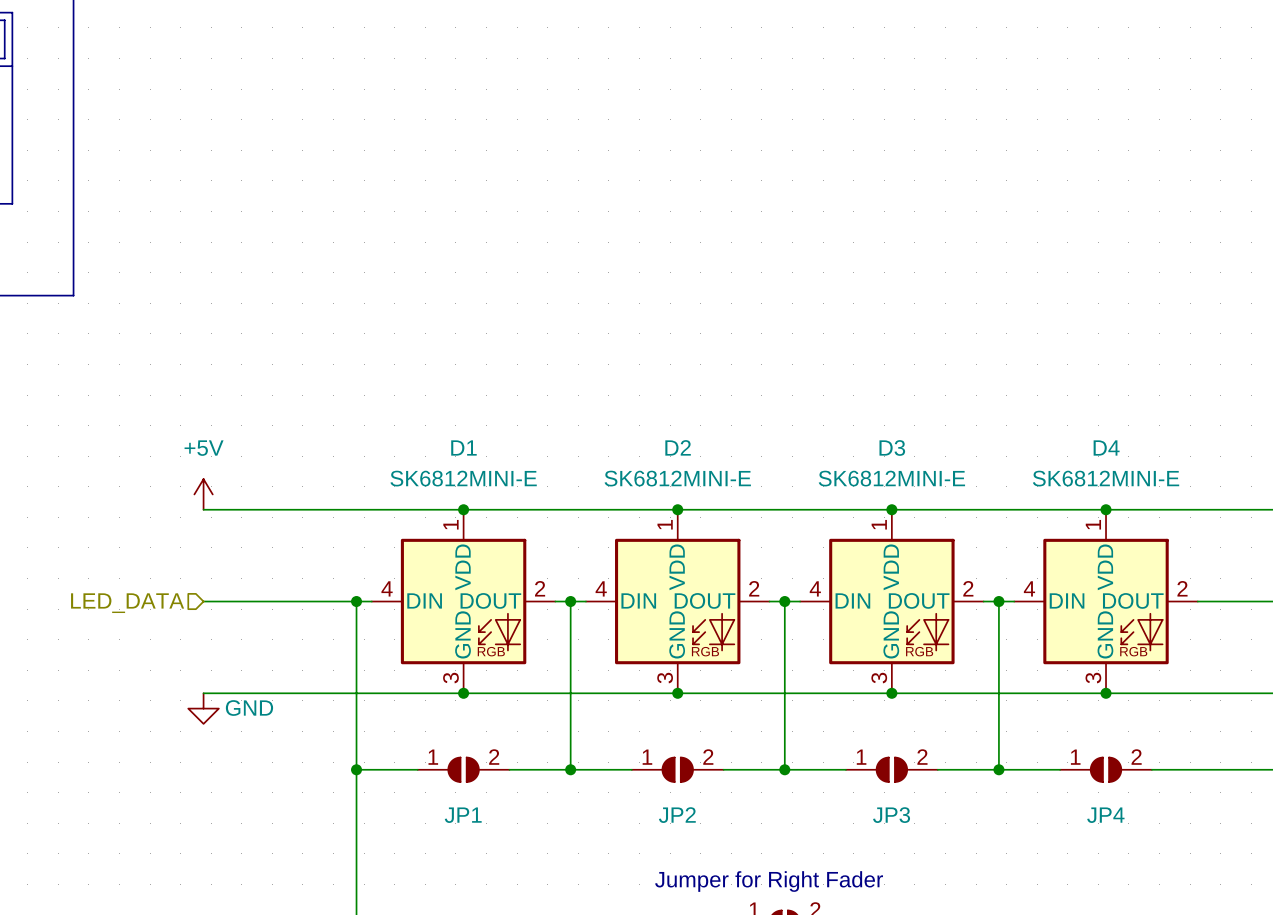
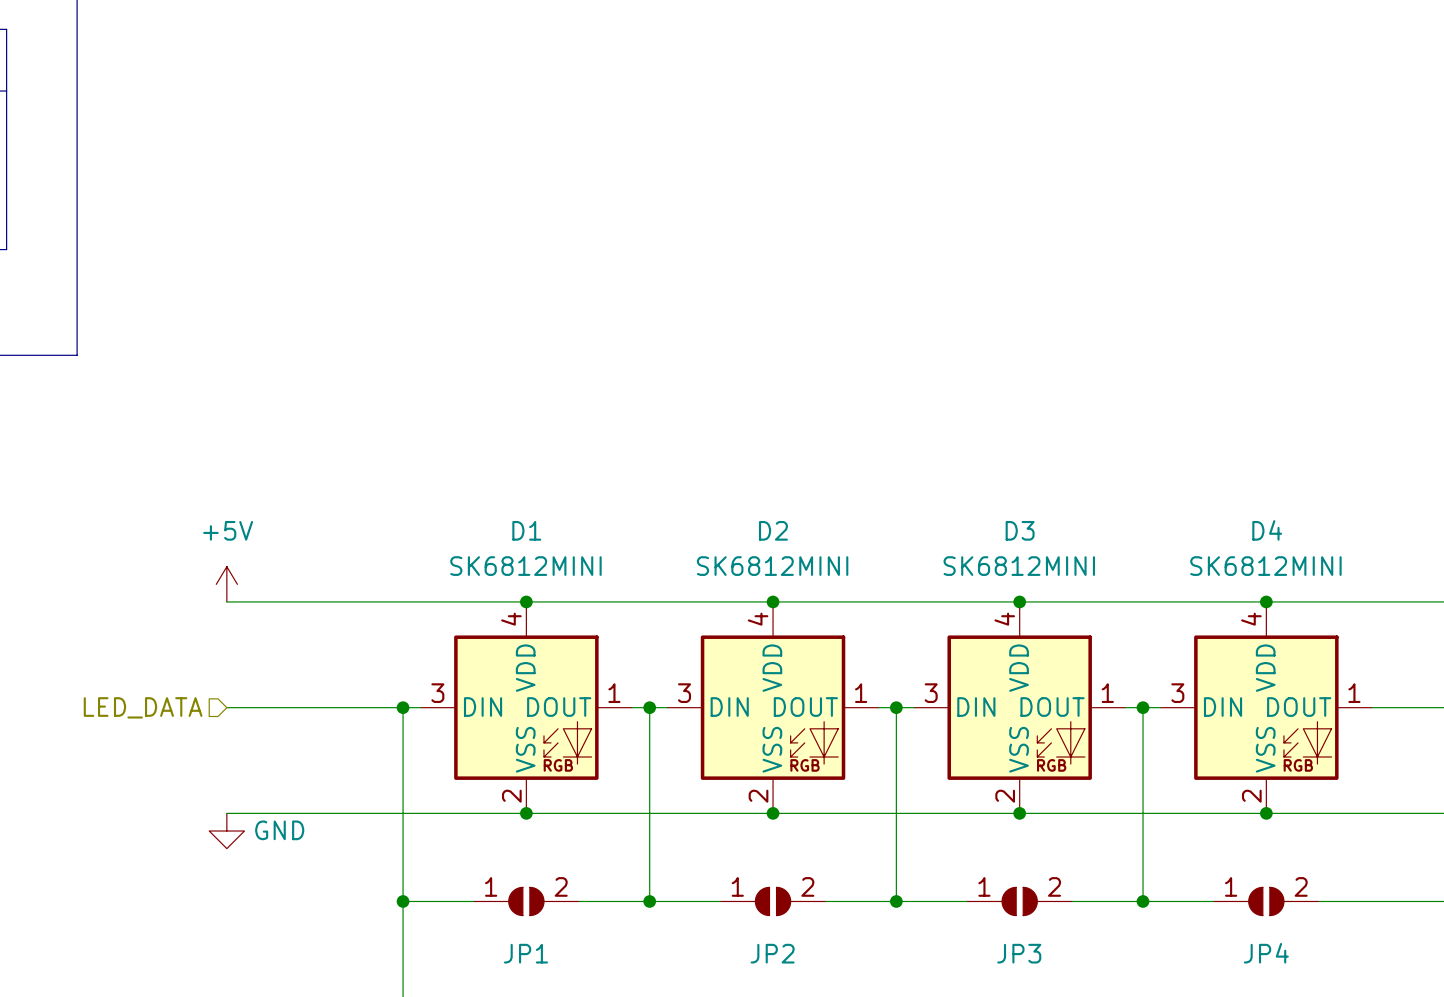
D1 value: SK6812MINI-E (463, 478) -> SK6812MINI (525, 566)
D2 value: SK6812MINI-E (677, 478) -> SK6812MINI (772, 566)
D3 value: SK6812MINI-E (891, 478) -> SK6812MINI (1019, 566)
D4 value: SK6812MINI-E (1106, 478) -> SK6812MINI (1265, 566)
D1 pin number: 1 (450, 524) -> 4 (511, 619)
D2 pin number: 1 (665, 524) -> 4 (758, 619)
D3 pin number: 1 (879, 524) -> 4 (1004, 619)
D4 pin number: 1 (1093, 524) -> 4 (1251, 619)
D1 pin number: 4 (387, 588) -> 3 (437, 693)
D1 pin number: 2 (540, 588) -> 1 (614, 693)
D2 pin number: 4 (601, 588) -> 3 (684, 693)
D2 pin number: 2 (754, 588) -> 1 (861, 693)
D3 pin number: 4 (815, 588) -> 3 (931, 693)
D3 pin number: 2 (968, 588) -> 1 (1107, 693)
D4 pin number: 4 (1029, 588) -> 3 (1177, 693)
D4 pin number: 2 (1182, 588) -> 1 (1354, 693)
D1 pin name: GND (463, 634) -> VSS (525, 749)
D2 pin name: GND (677, 634) -> VSS (772, 749)
D3 pin name: GND (891, 634) -> VSS (1019, 749)
D4 pin name: GND (1105, 634) -> VSS (1265, 749)
D1 pin number: 3 (450, 678) -> 2 (511, 796)
D2 pin number: 3 (665, 678) -> 2 (758, 796)
D3 pin number: 3 (879, 678) -> 2 (1005, 796)
D4 pin number: 3 (1093, 678) -> 2 (1251, 796)

